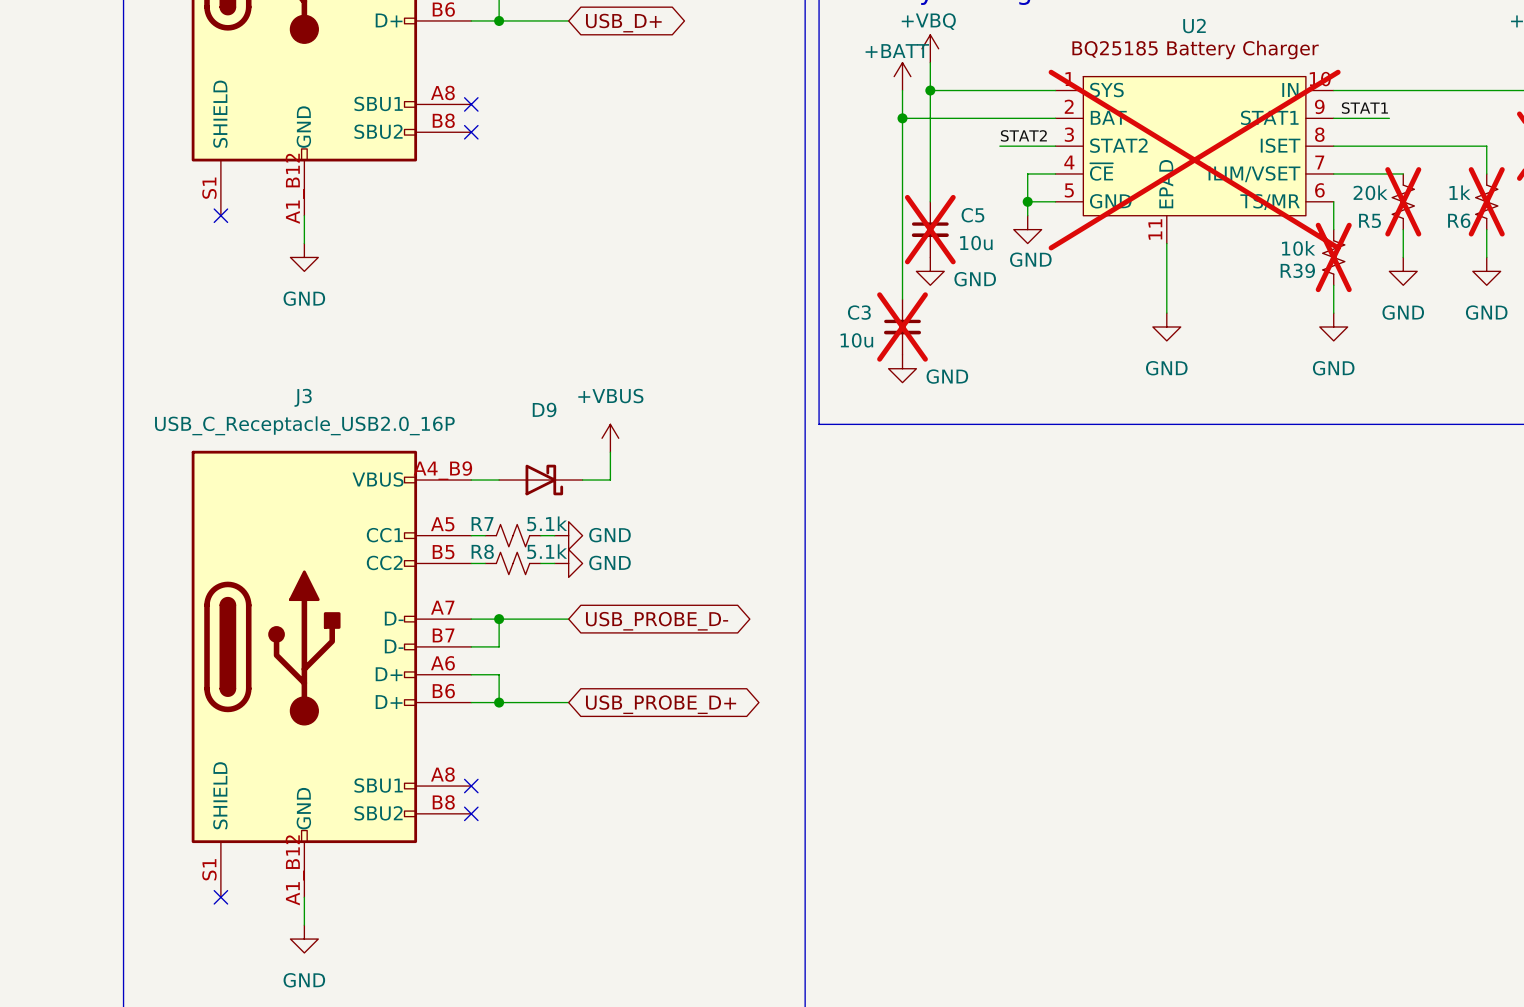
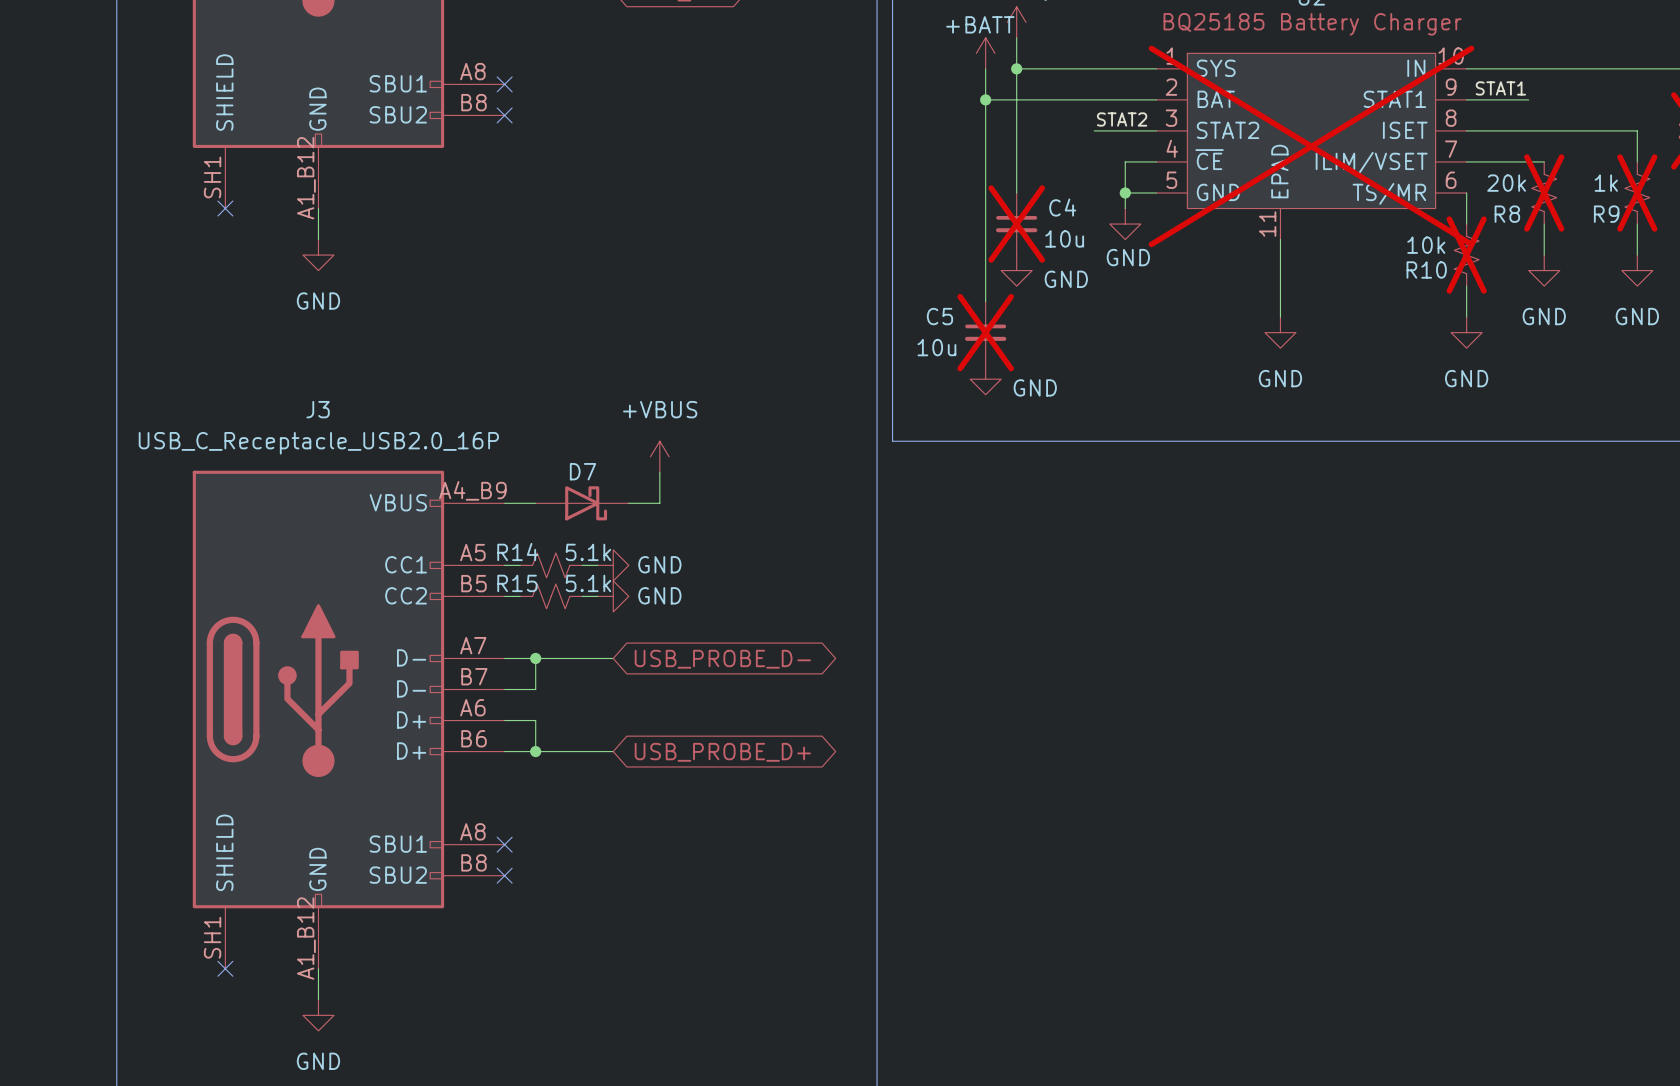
part pin number: S1 (209, 188) -> SH1 (212, 177)
C5 name: C5 (972, 215) -> C4 (1062, 207)
R5 name: R5 (1369, 220) -> R8 (1507, 214)
R6 name: R6 (1459, 220) -> R9 (1606, 214)
R39 name: R39 (1297, 270) -> R10 (1426, 270)
C3 name: C3 (859, 312) -> C5 (939, 316)
D9 name: D9 (544, 409) -> D7 (582, 471)
R7 name: R7 (482, 524) -> R14 (517, 552)
R8 name: R8 (482, 551) -> R15 (517, 583)
J3 pin number: S1 (209, 869) -> SH1 (212, 937)

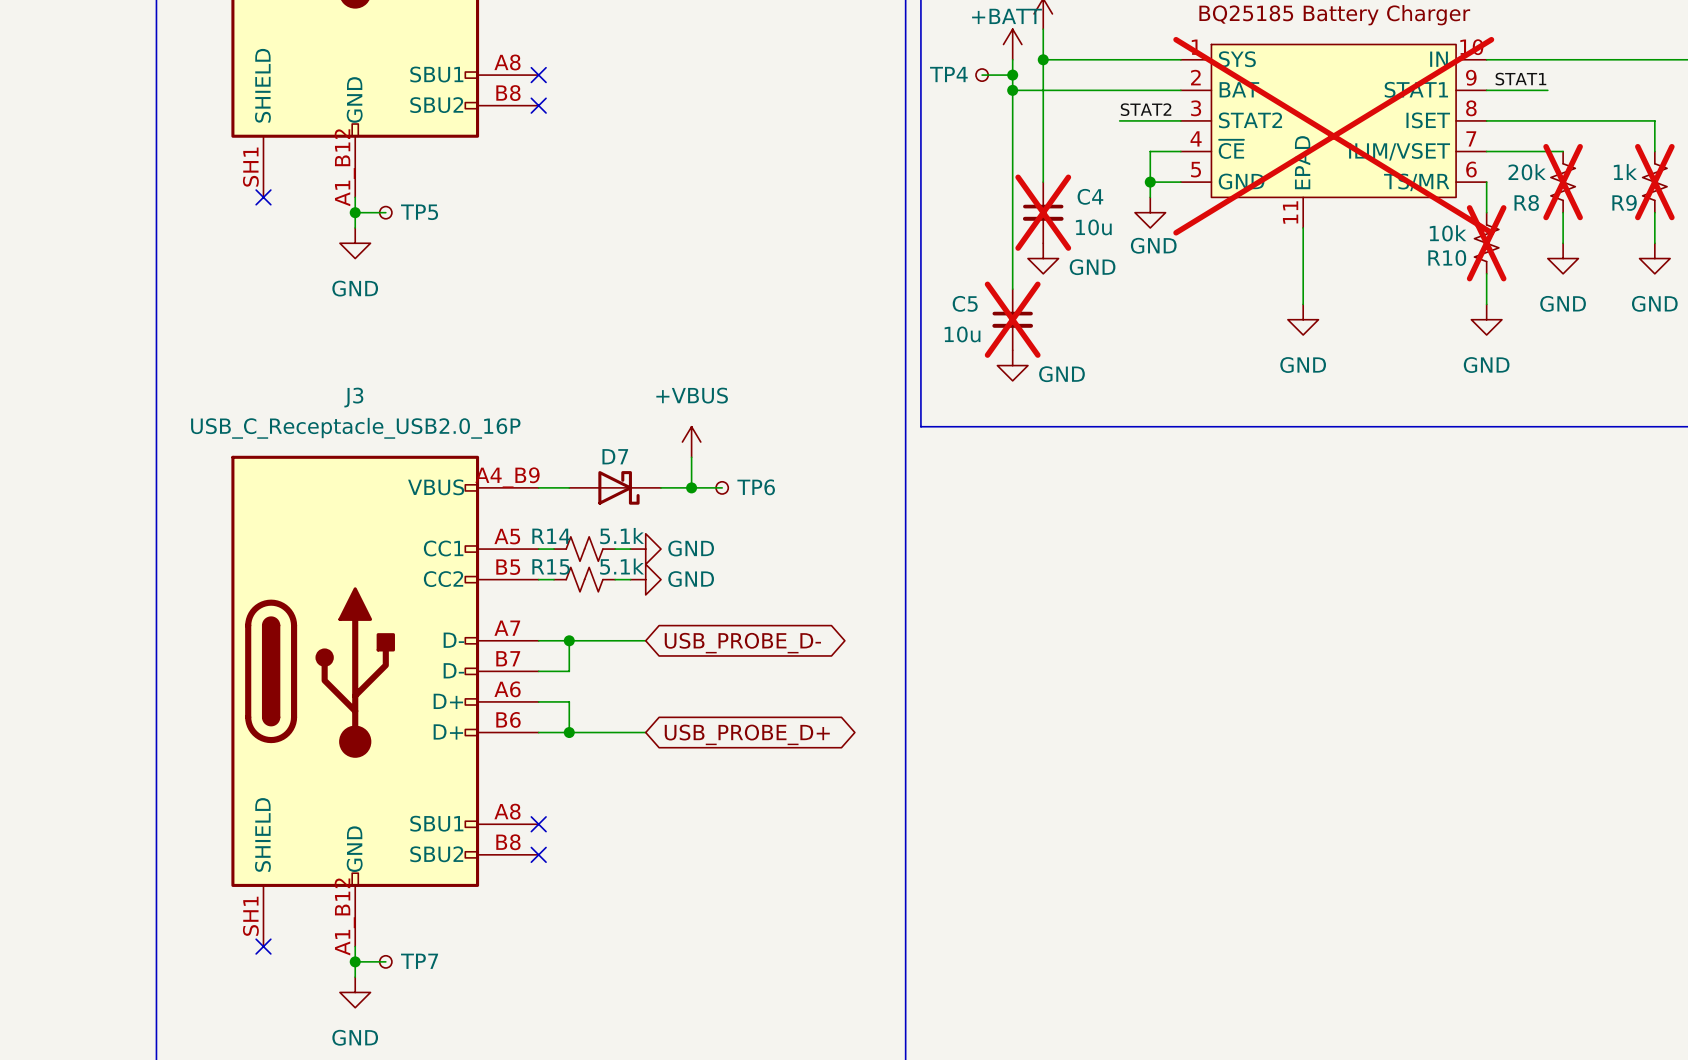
wire: none -> (982, 75) (1012, 75)
TP4: none -> (982, 75)
junction: none -> (1012, 75)
wire: none -> (355, 212) (385, 212)
junction: none -> (355, 212)
TP5: none -> (385, 212)
wire: none -> (691, 487) (722, 487)
junction: none -> (691, 487)
TP6: none -> (722, 487)
wire: none -> (355, 961) (385, 961)
junction: none -> (355, 961)
TP7: none -> (385, 961)

